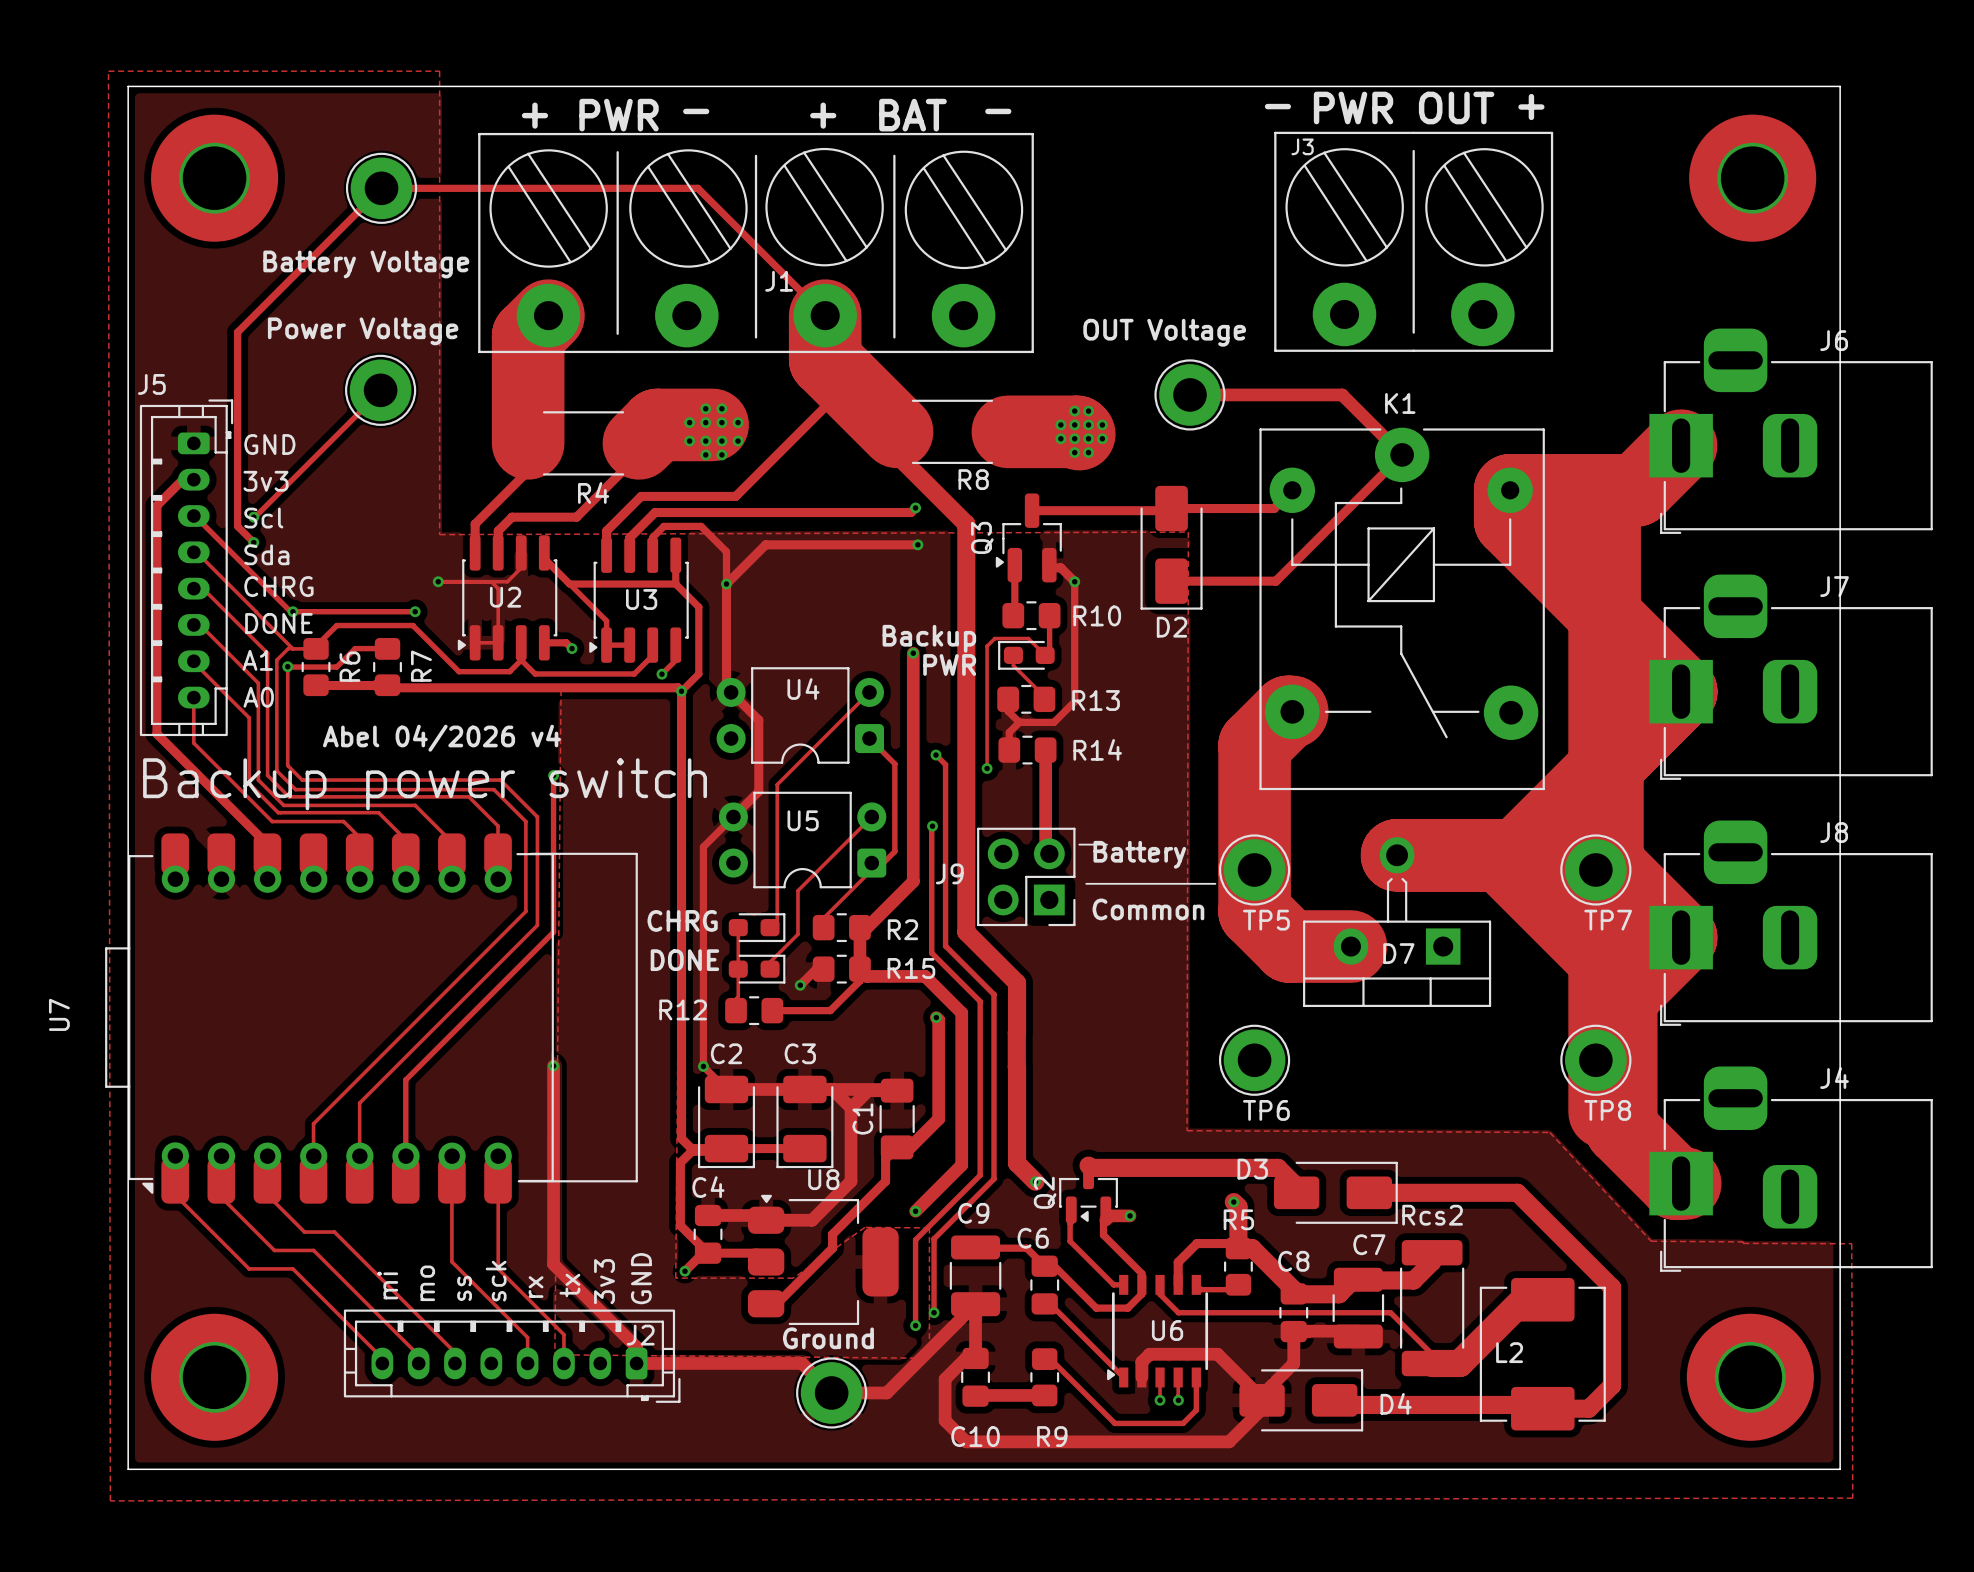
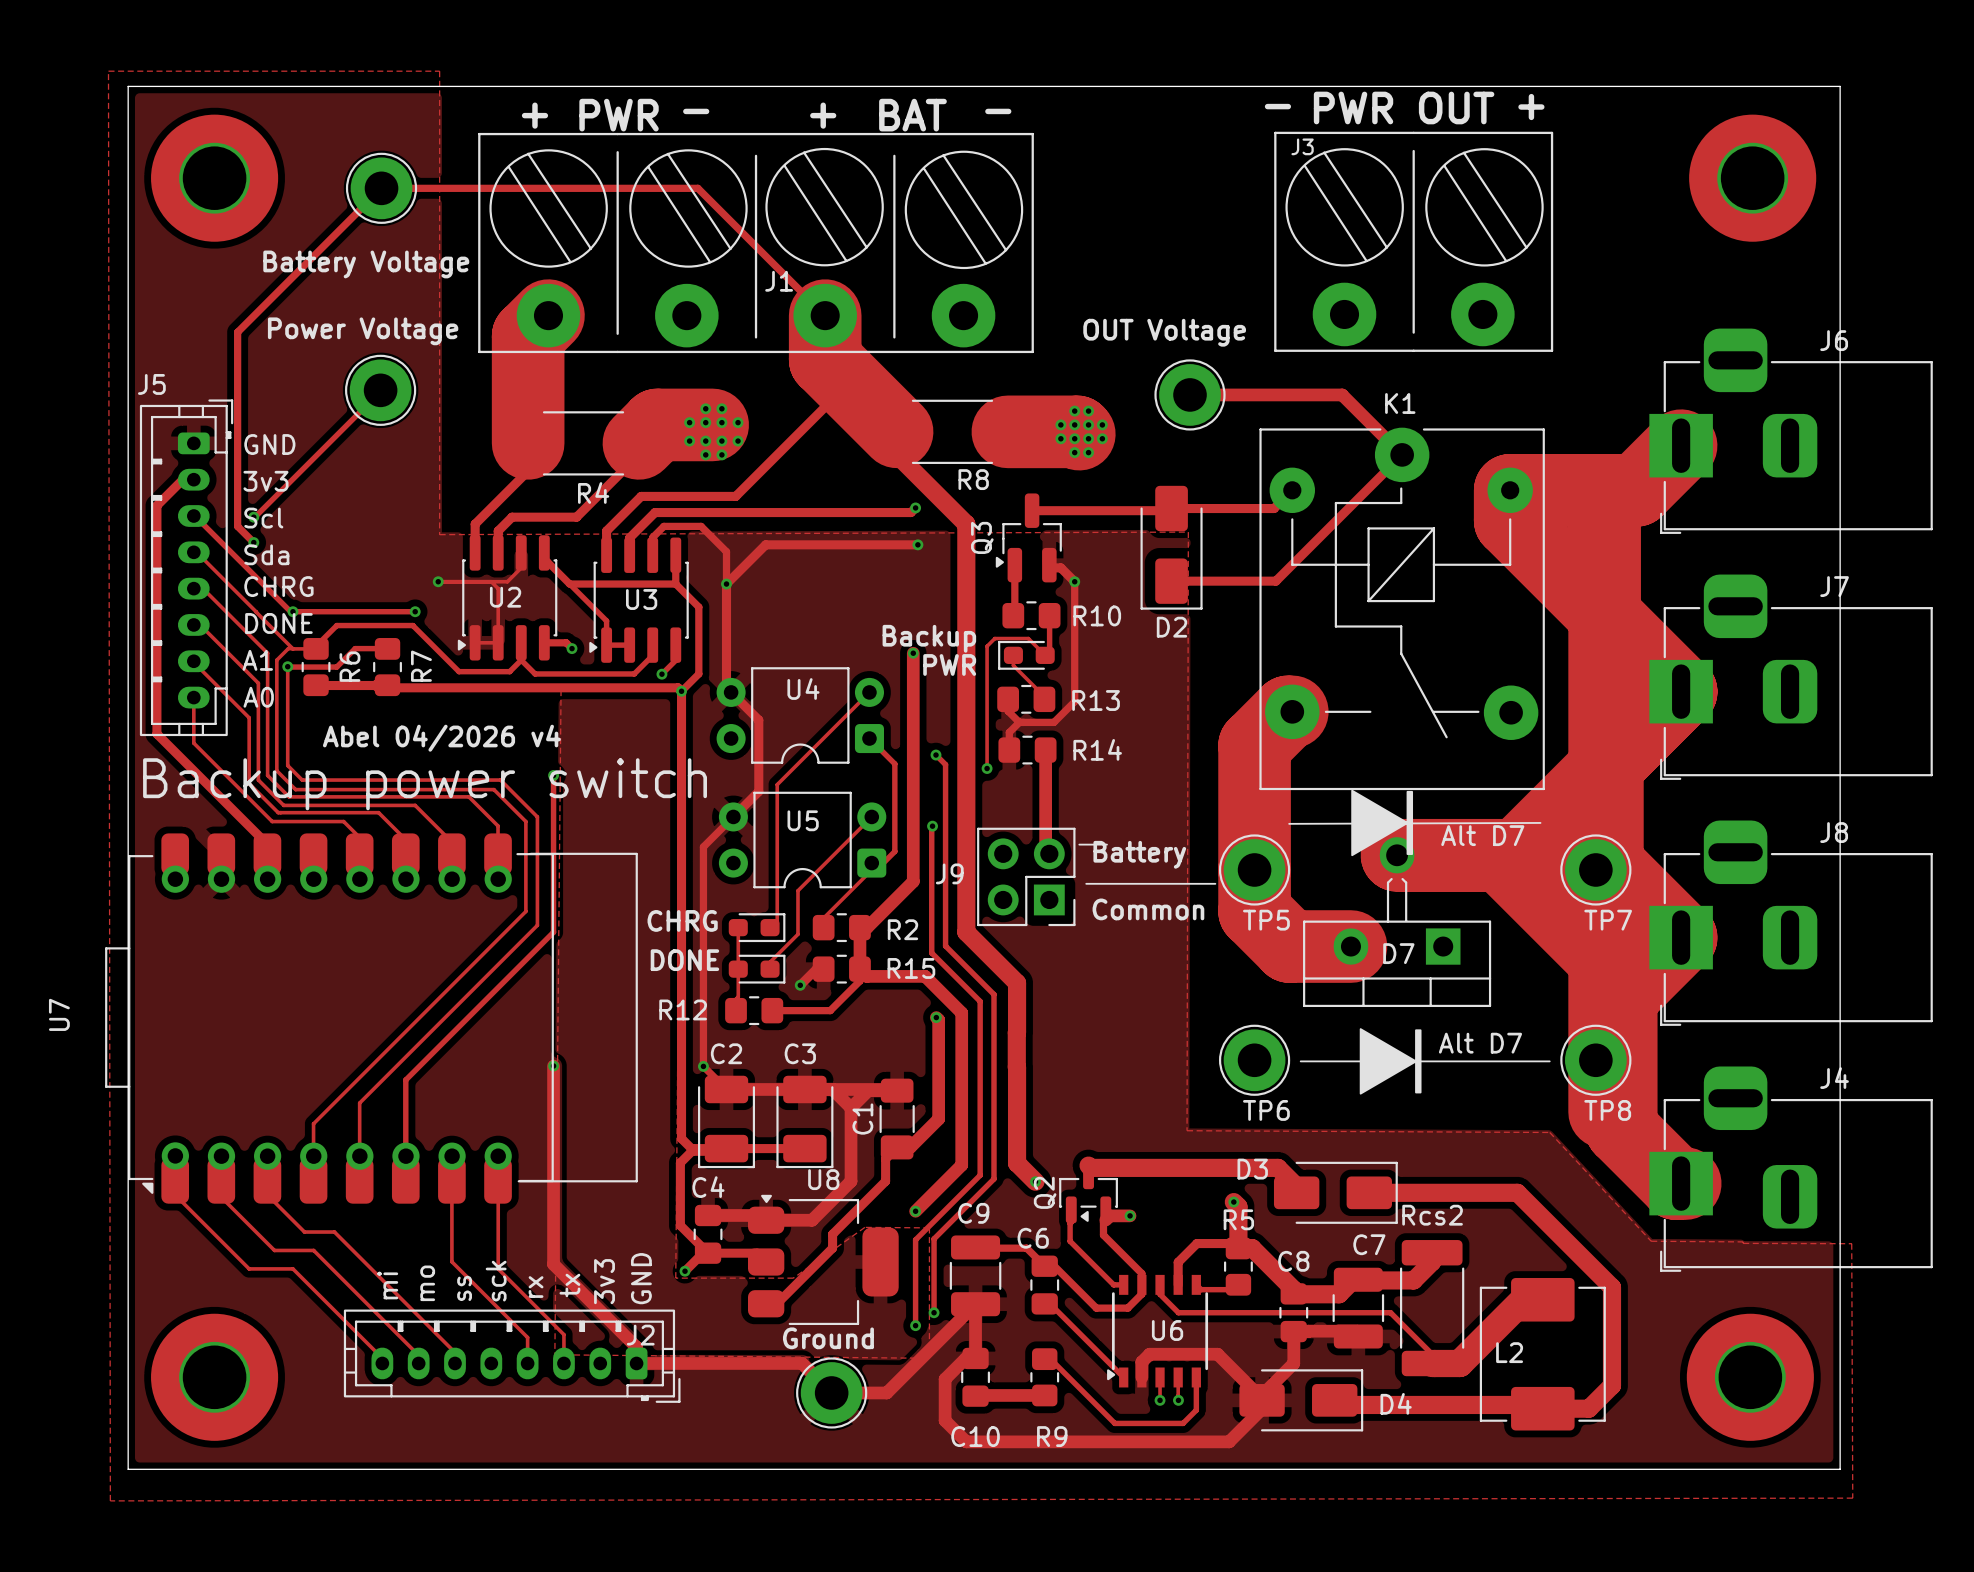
drawing: none -> [1351, 789, 1414, 857]
line: none -> (1540, 822) (1289, 823)
text: none -> Alt D7 (1482, 835)
drawing: none -> [1359, 1028, 1422, 1095]
text: none -> Alt D7 (1480, 1043)
line: none -> (1300, 1061) (1549, 1061)

